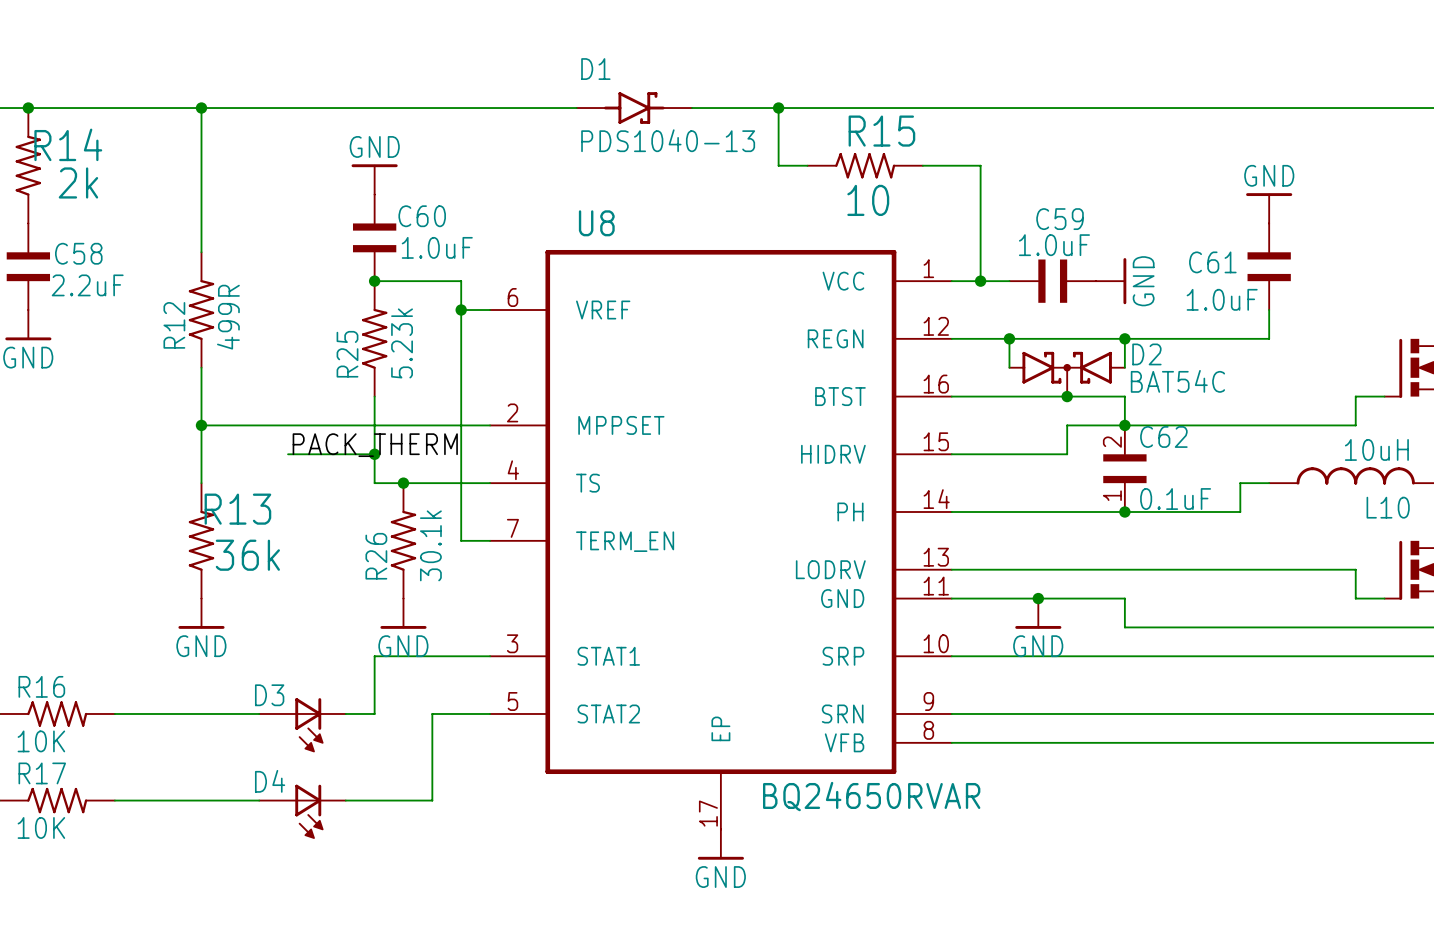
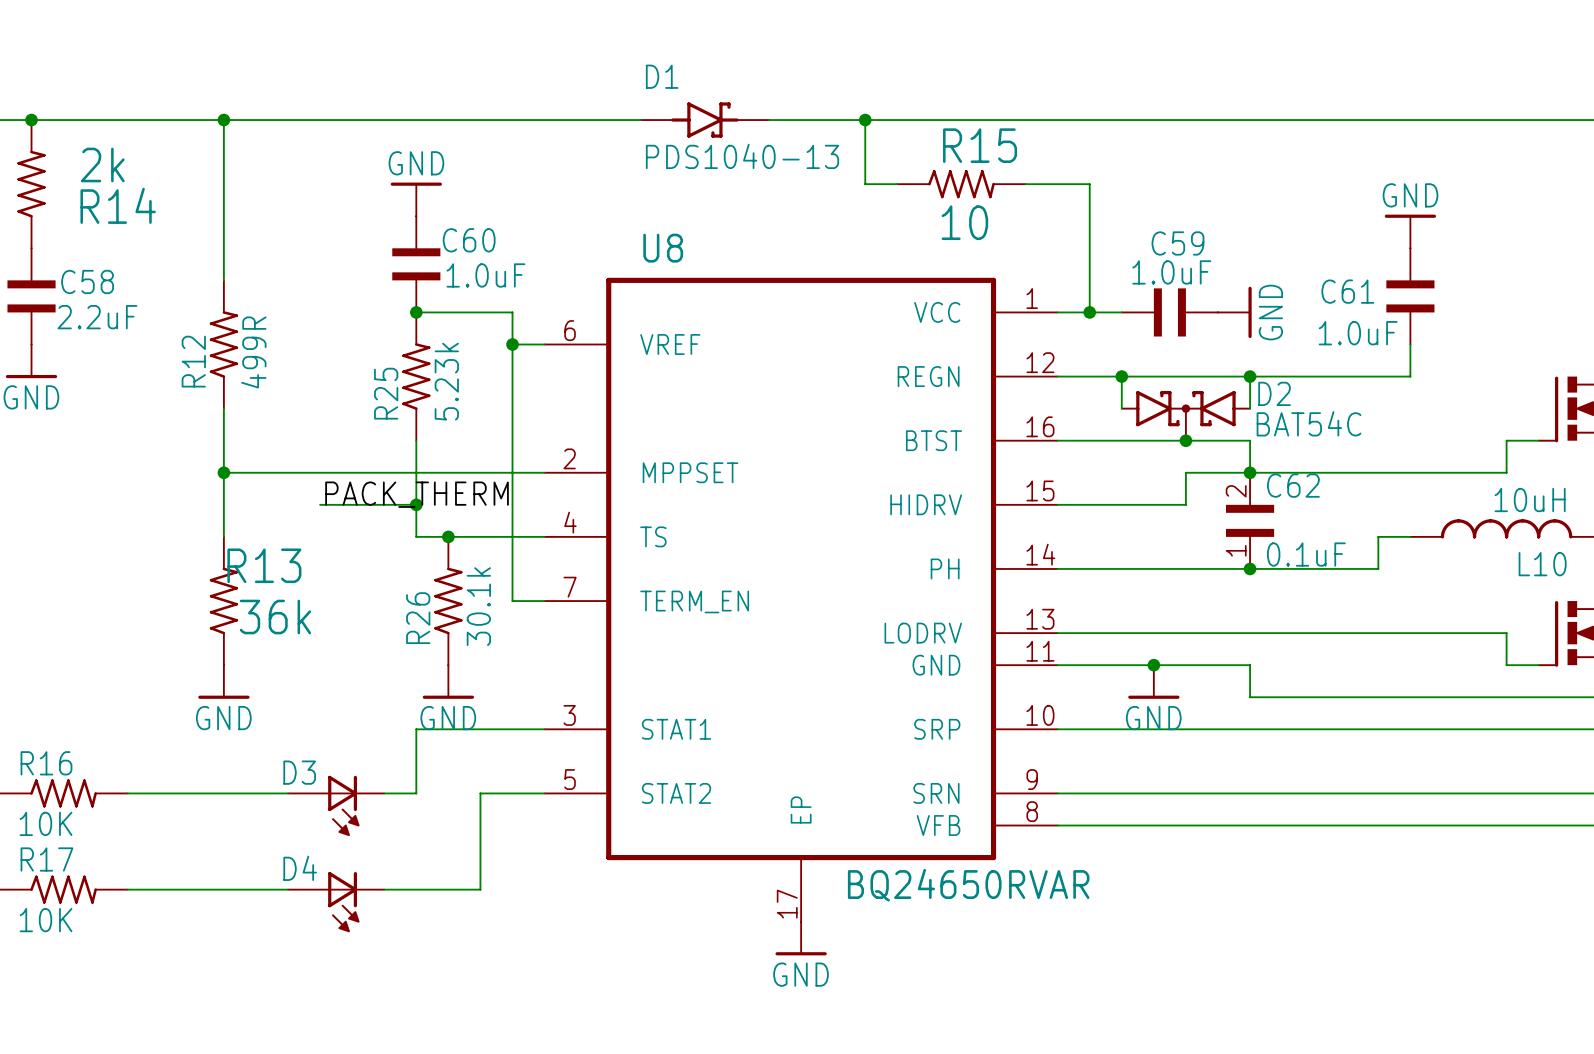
R14 name position: R14 (68, 144) -> R14 (118, 205)
R14 value position: 2k (78, 182) -> 2k (102, 164)

